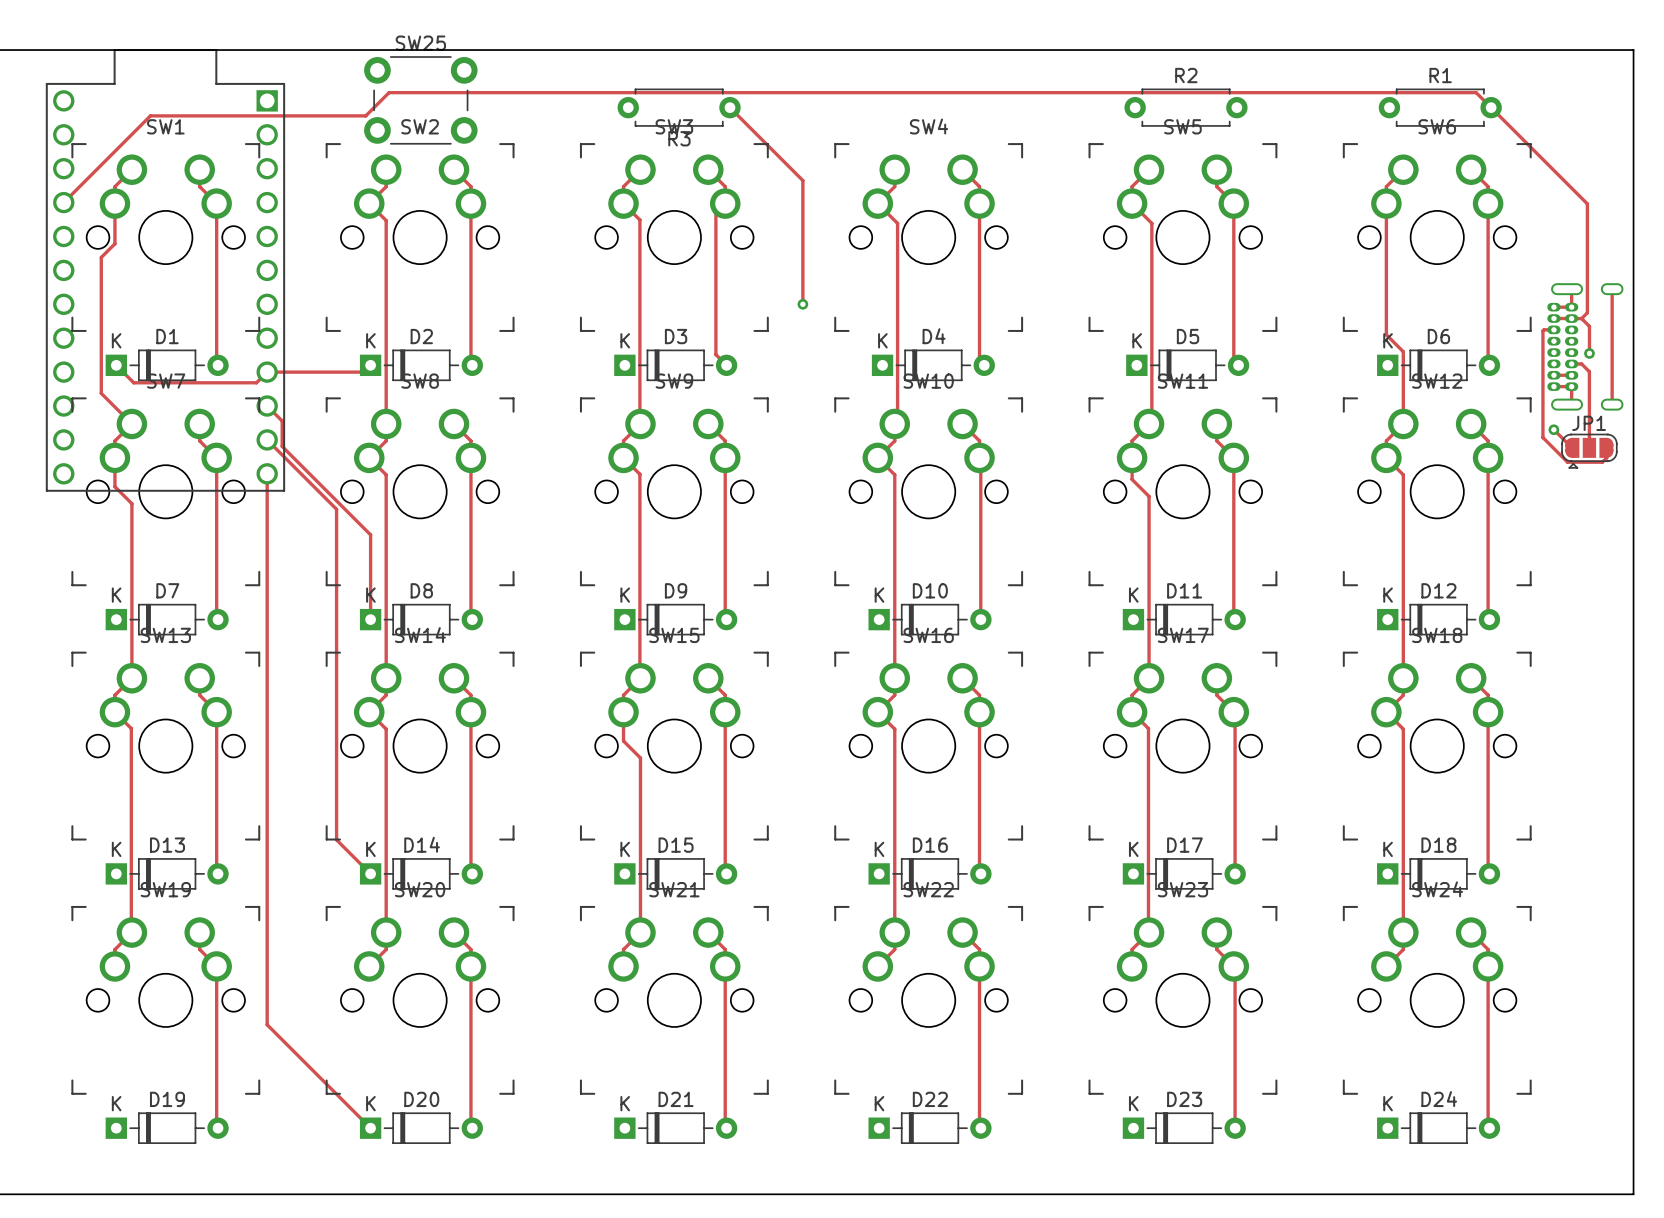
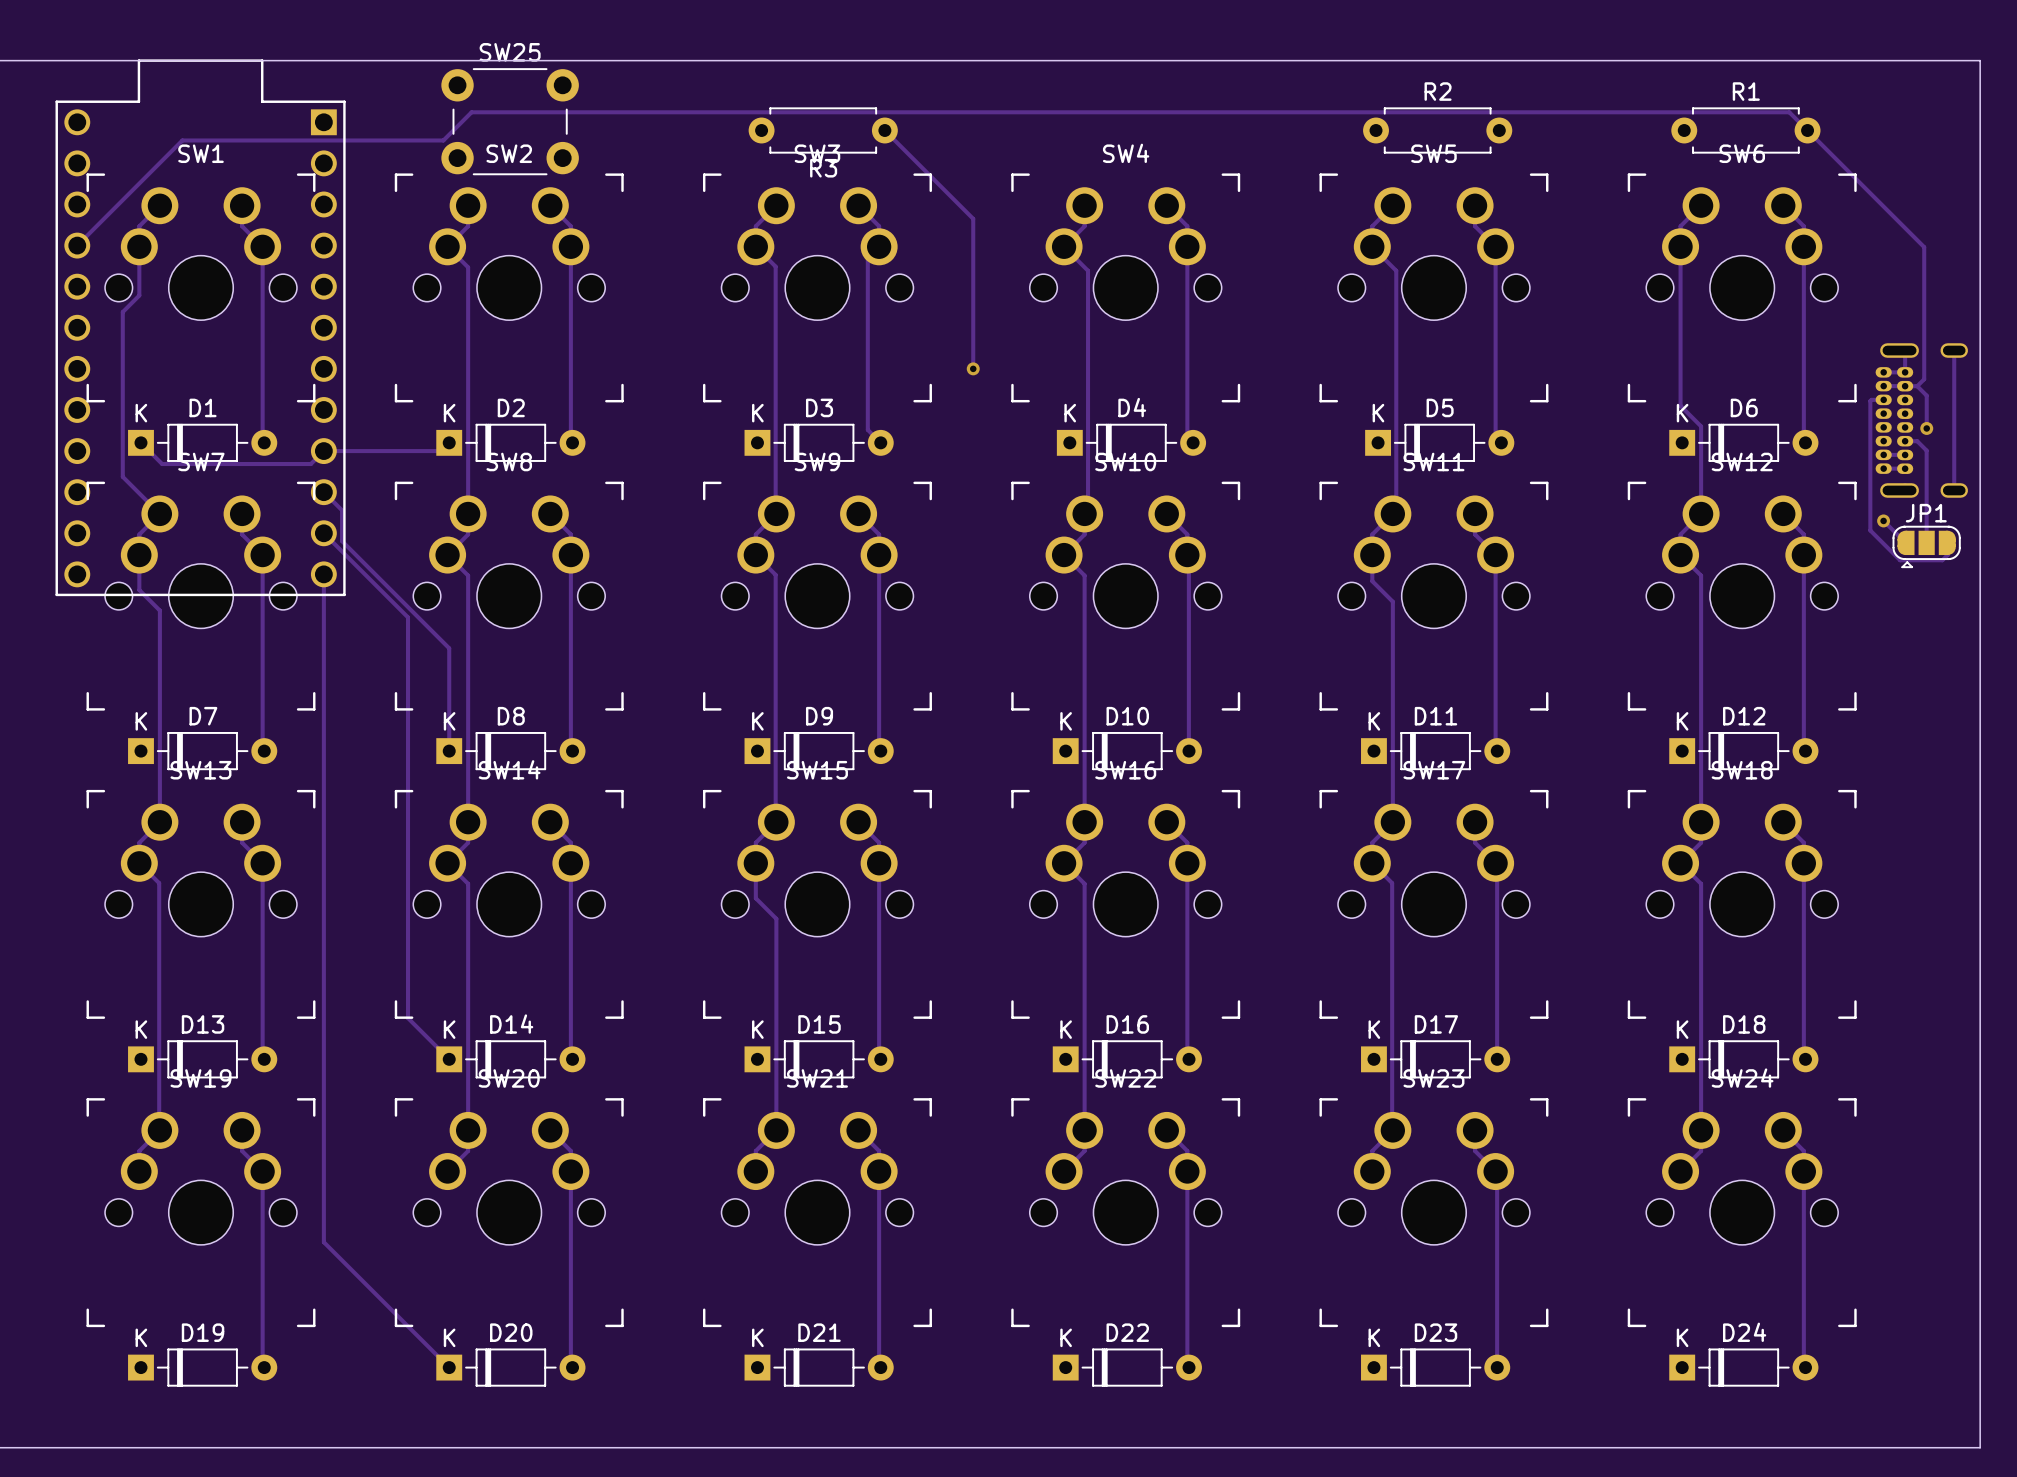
track: (1571, 386) (1571, 400) -> none

